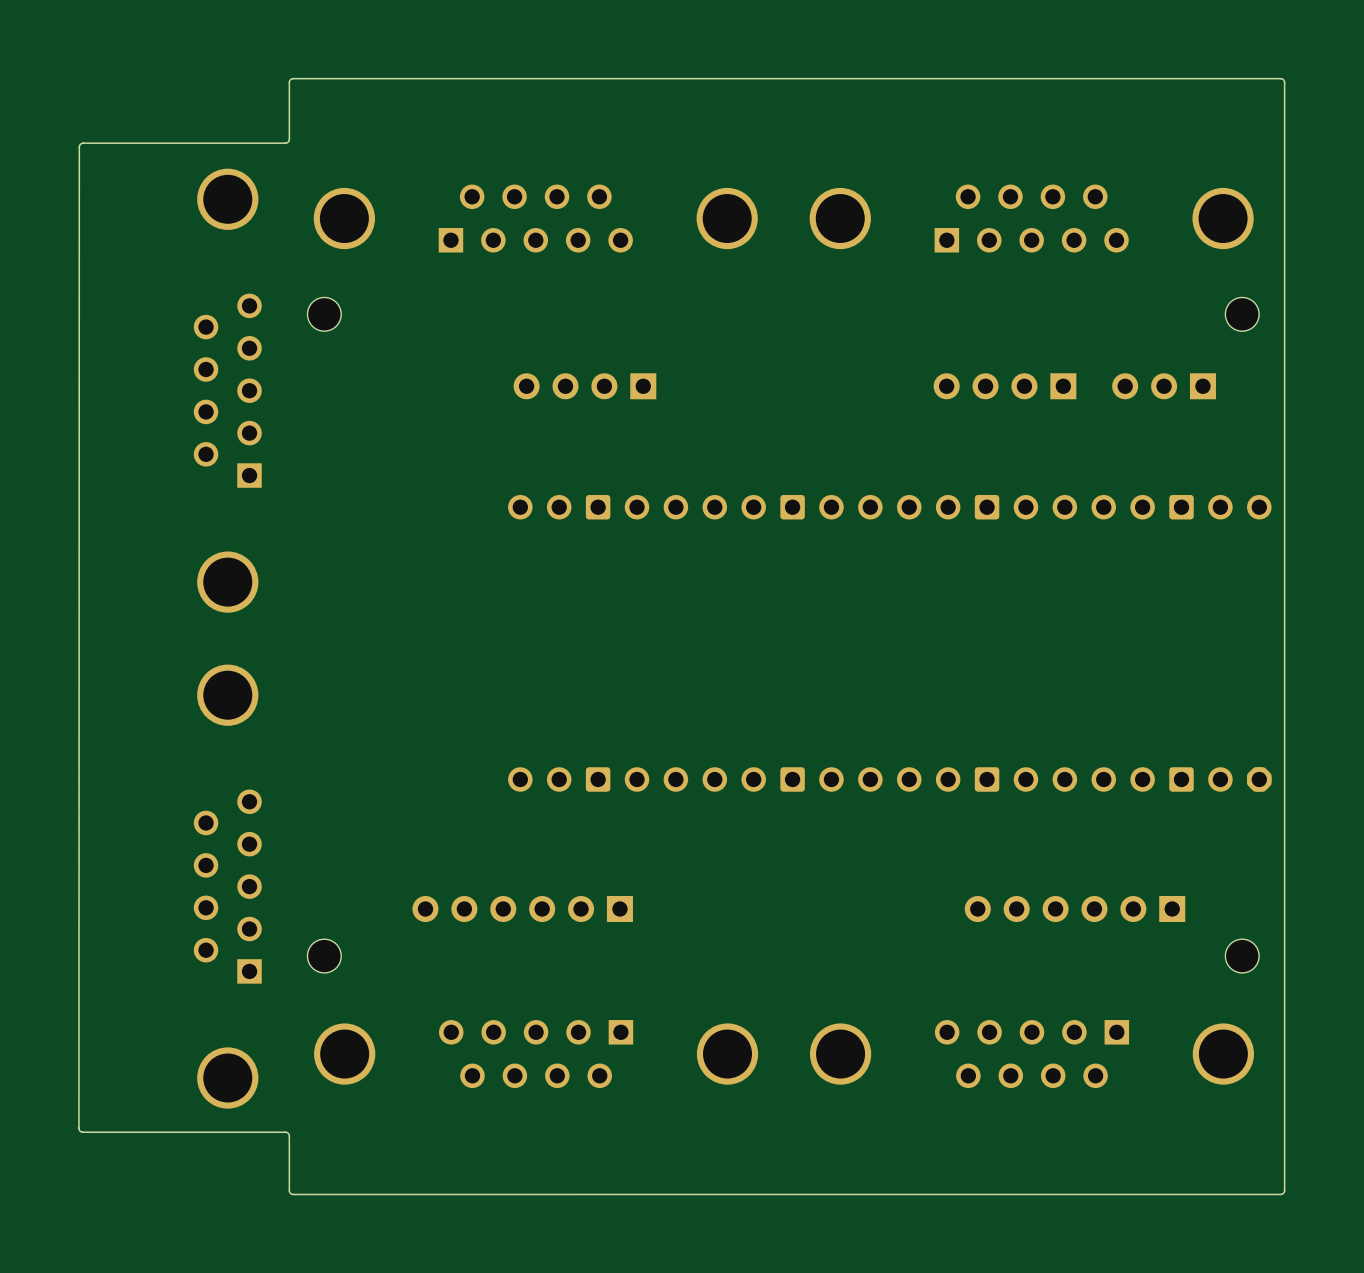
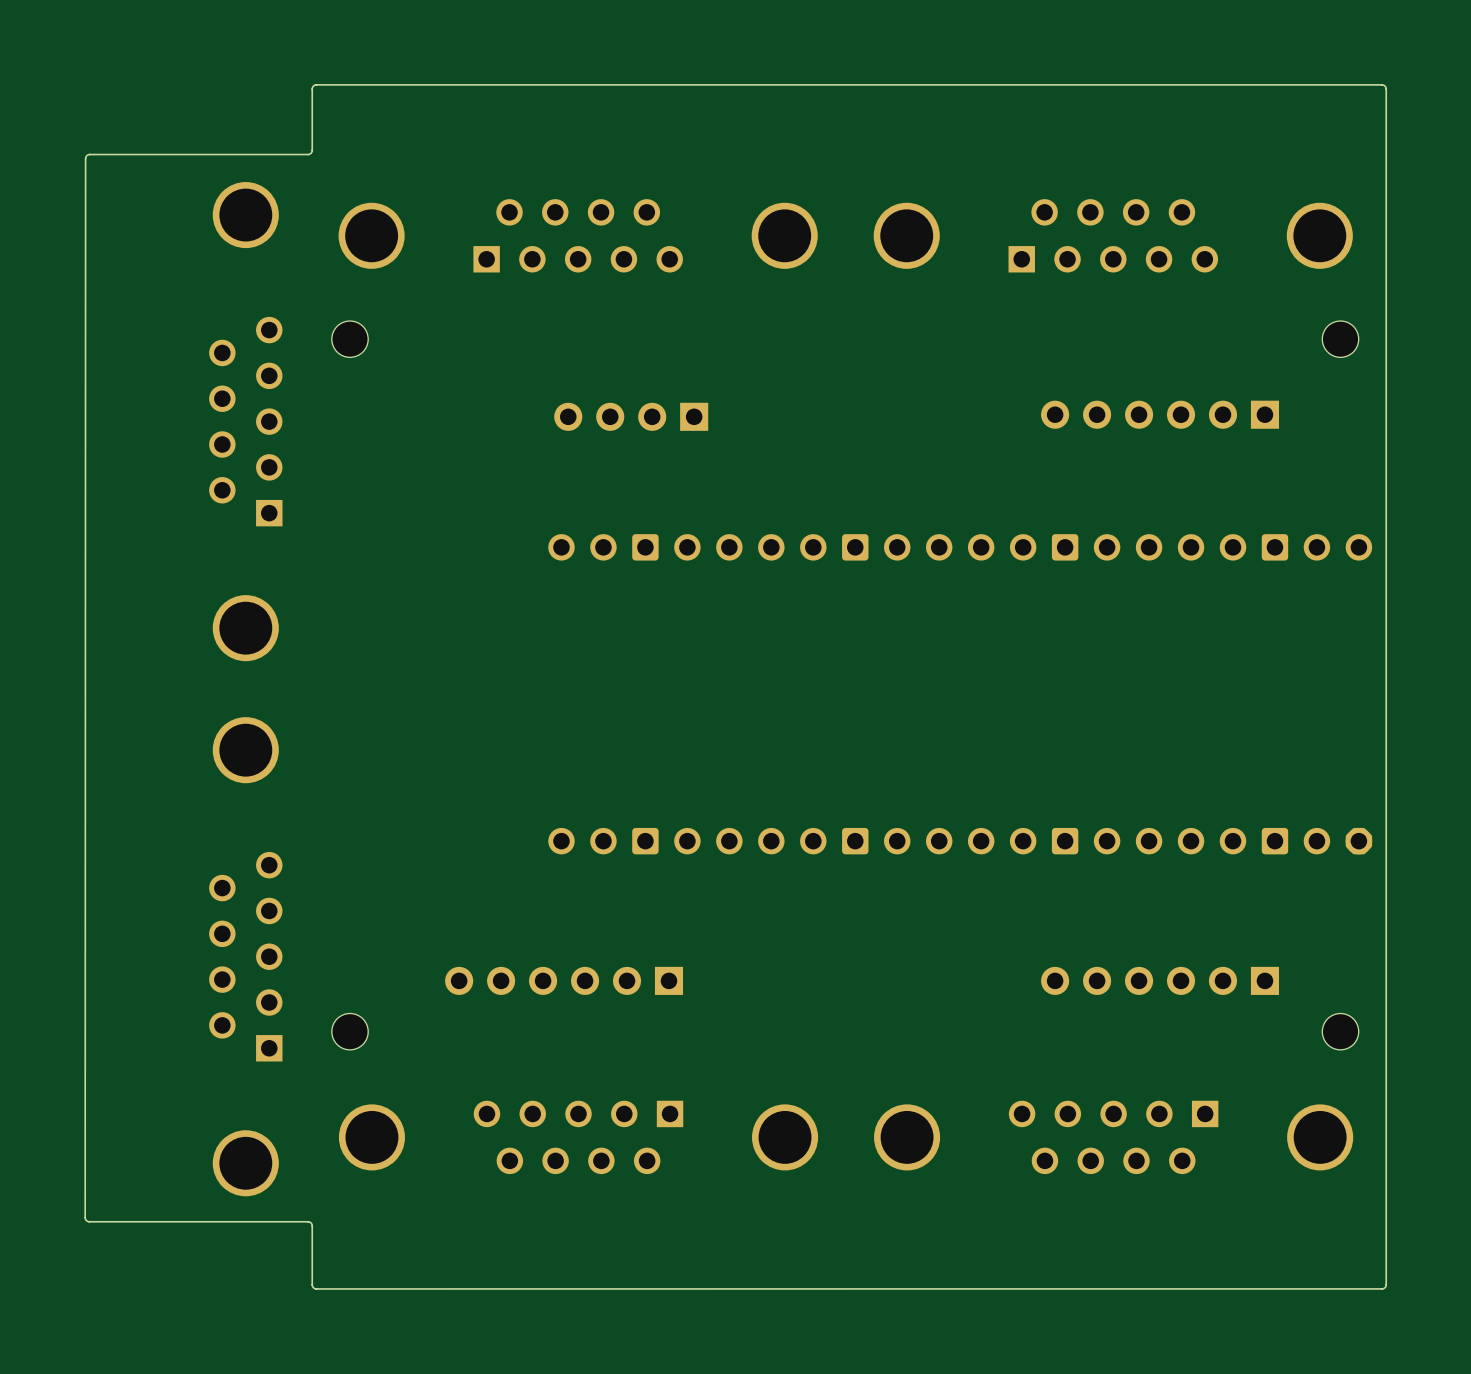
part: none -> (1160, 414)
part: (1005, 386) -> none
part: (1164, 386) -> none

